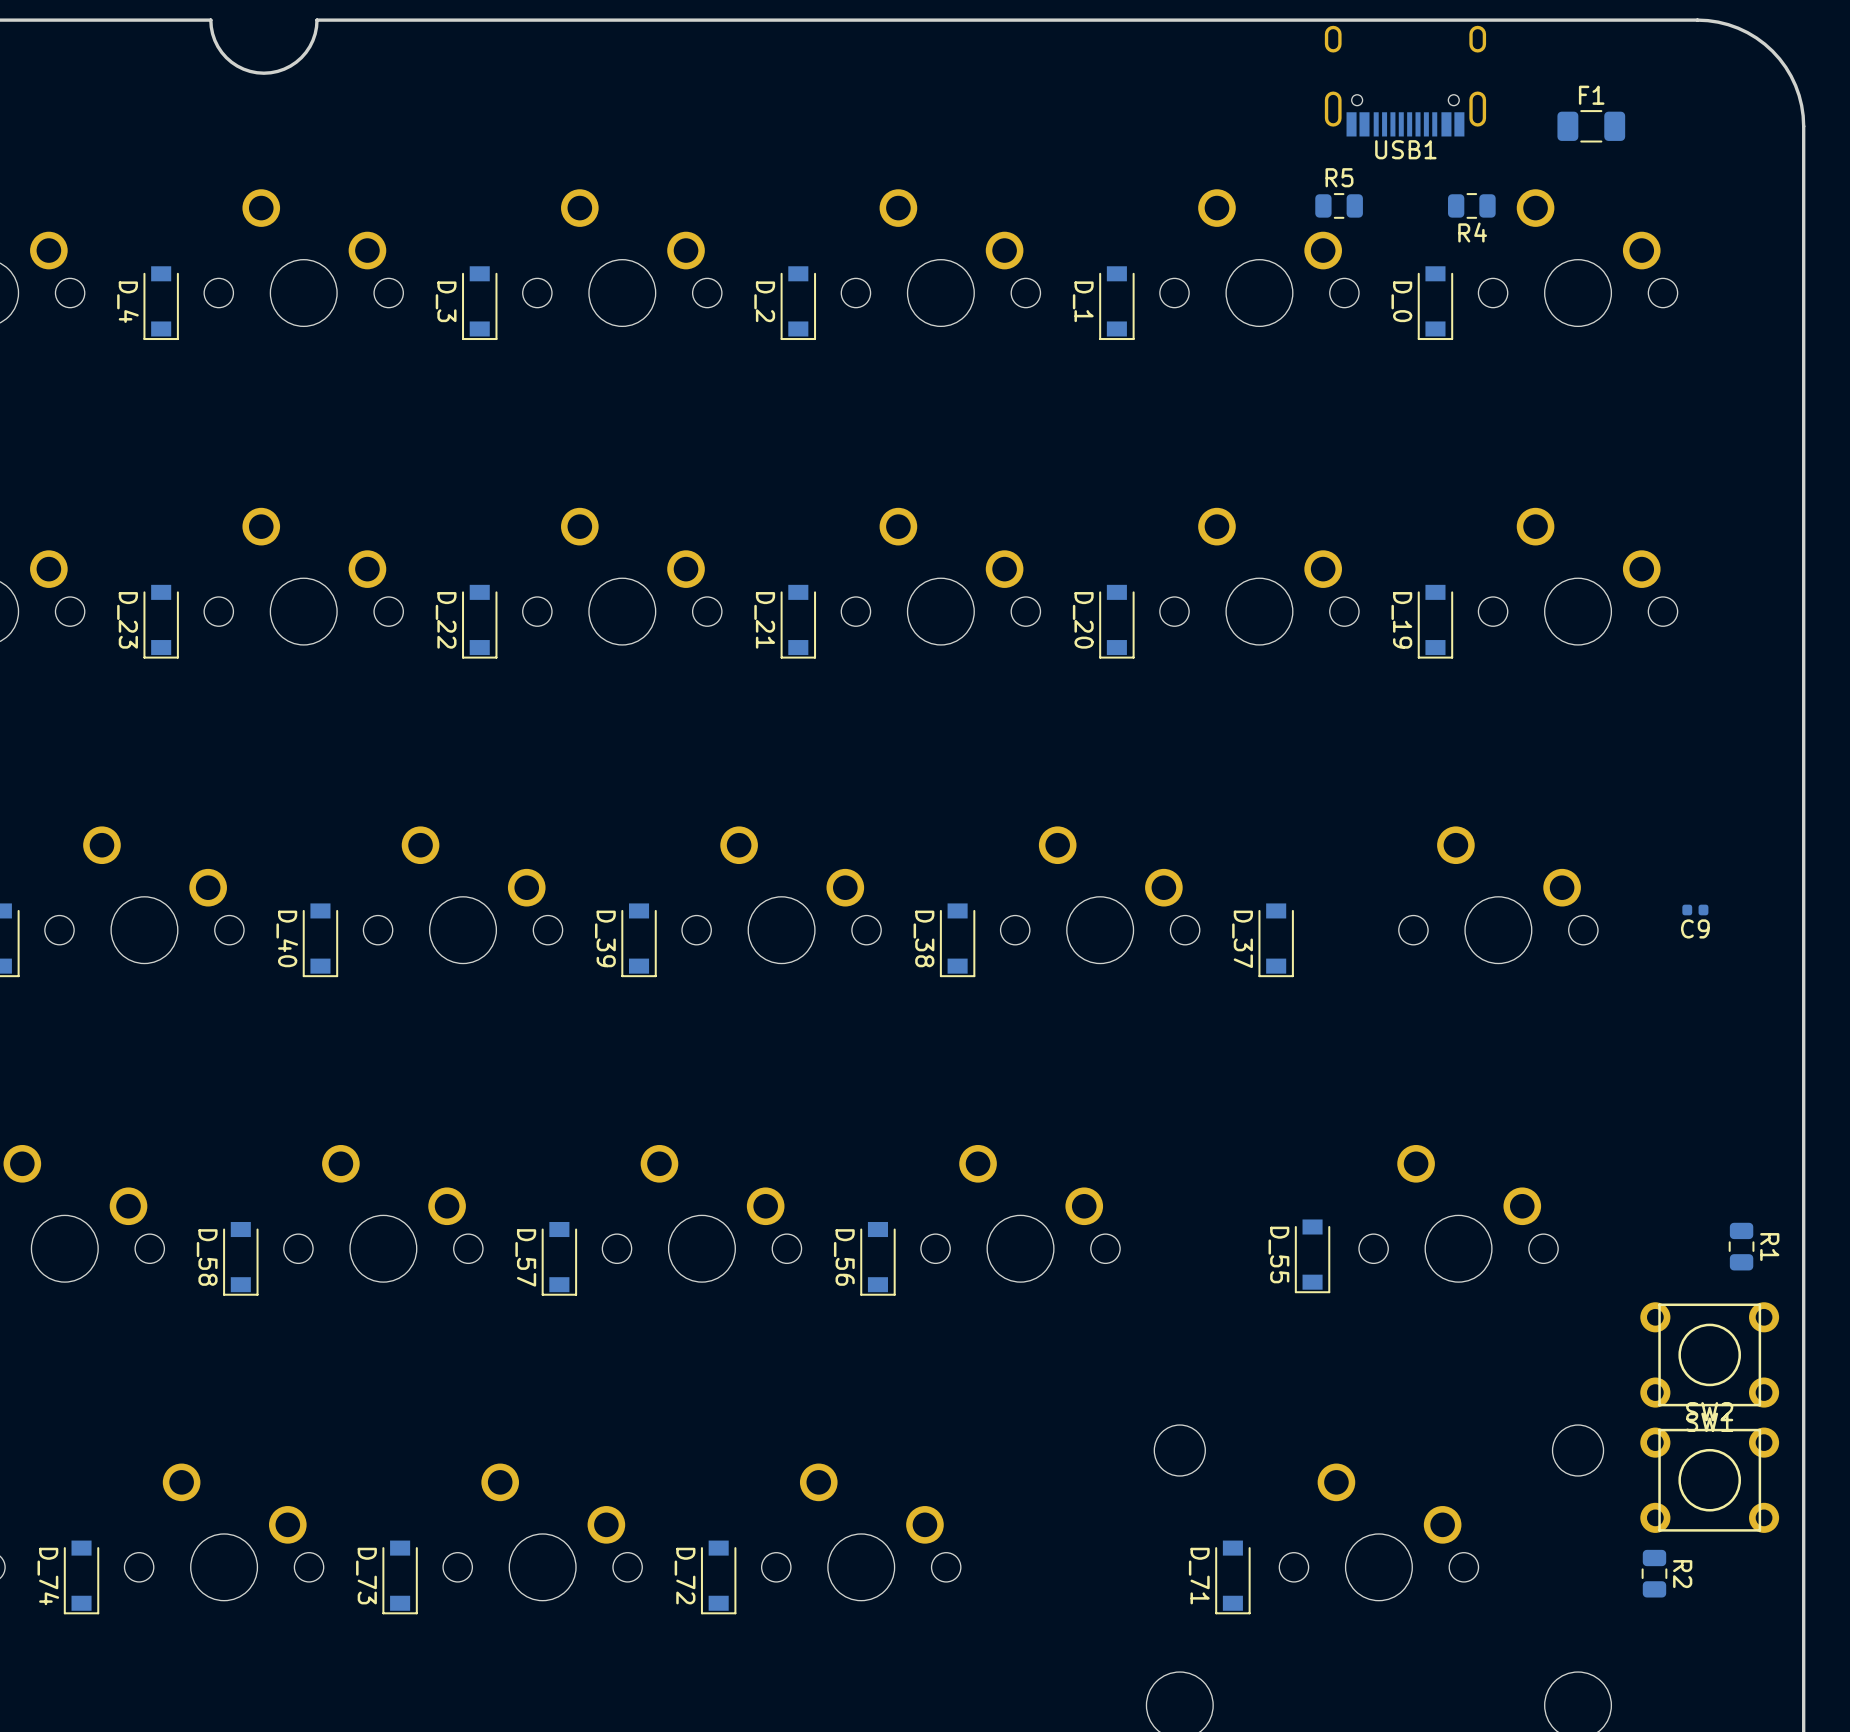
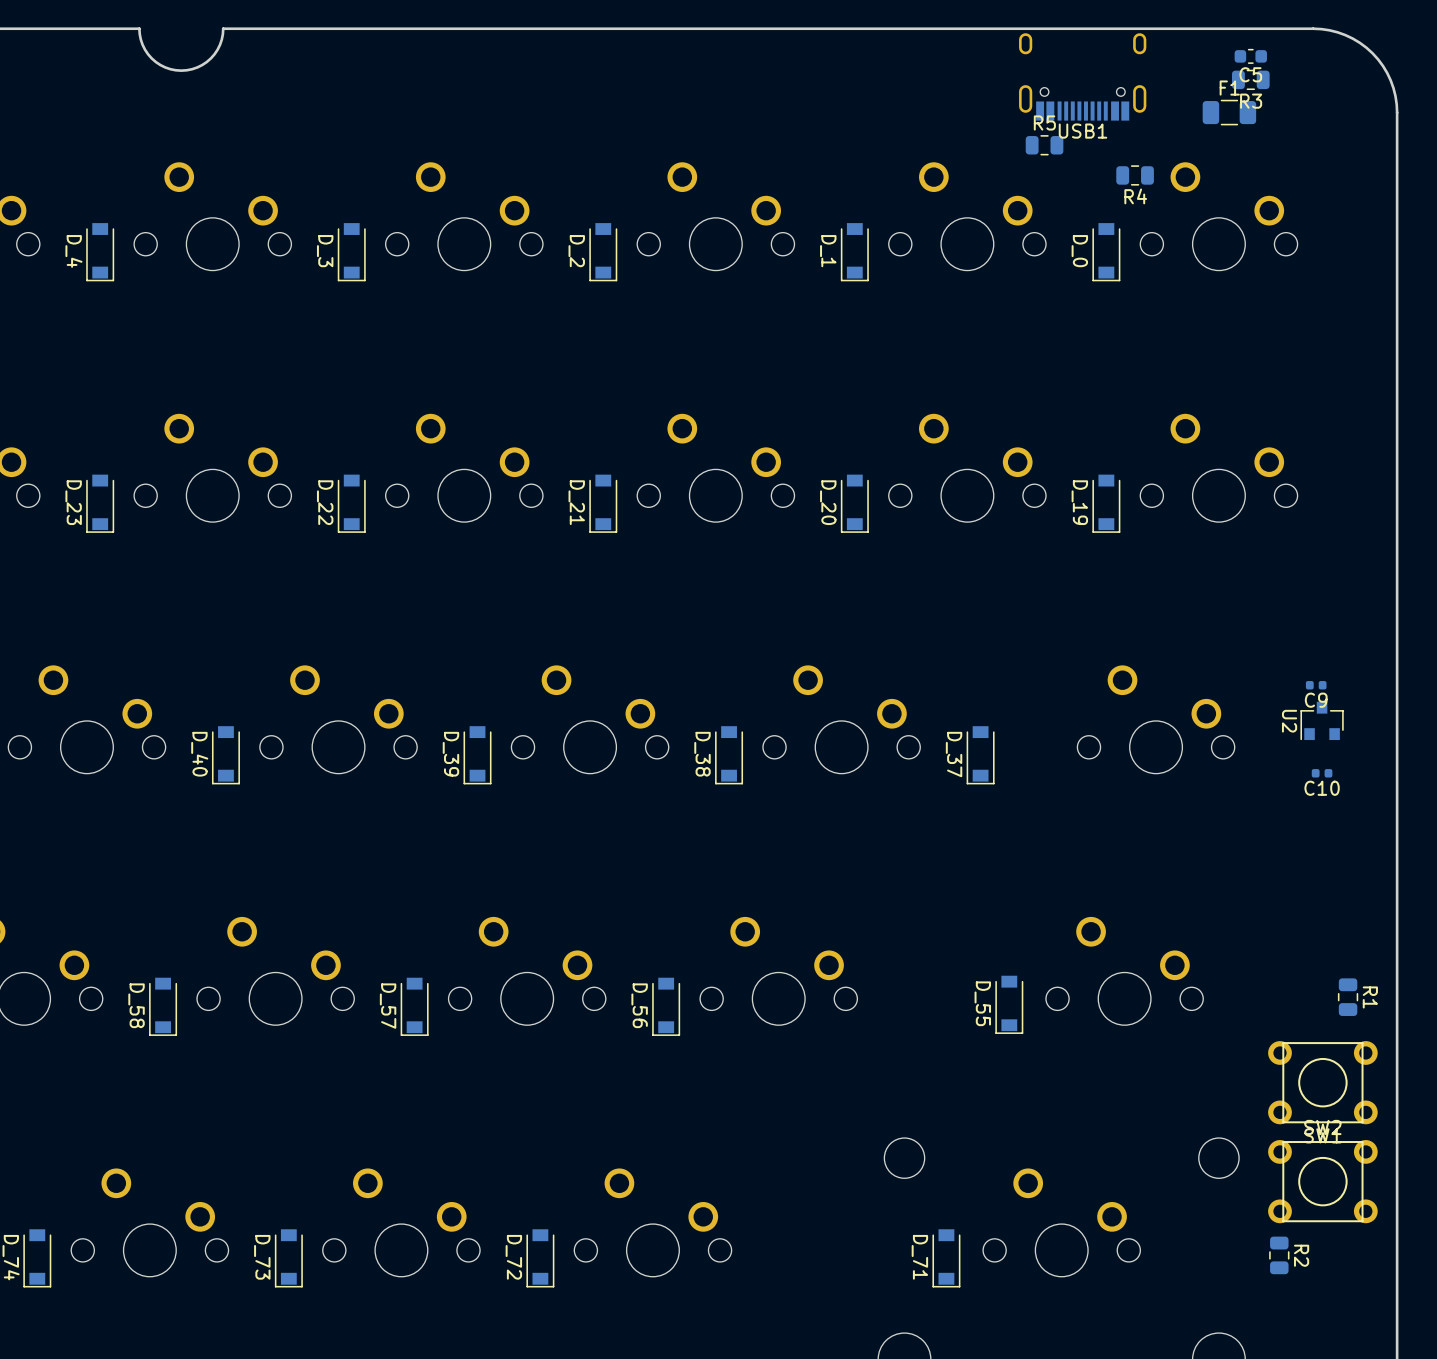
C5: none -> (1250, 56)
R3: none -> (1250, 79)
R5 position: (1339, 205) -> (1044, 145)
U2: none -> (1322, 720)
C9 position: (1695, 909) -> (1316, 685)
C10: none -> (1322, 773)

